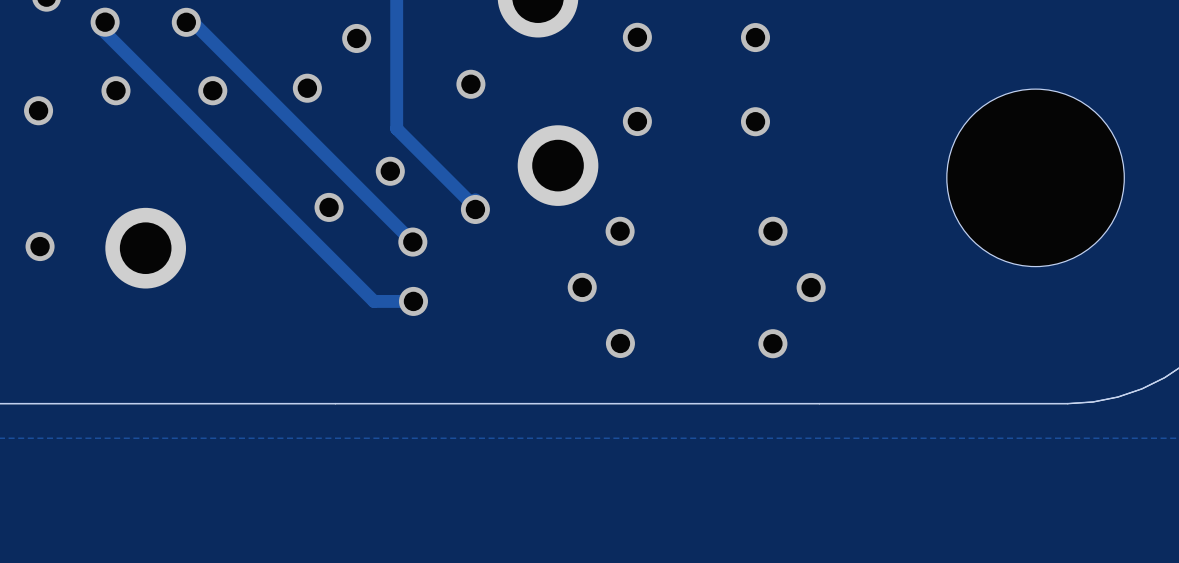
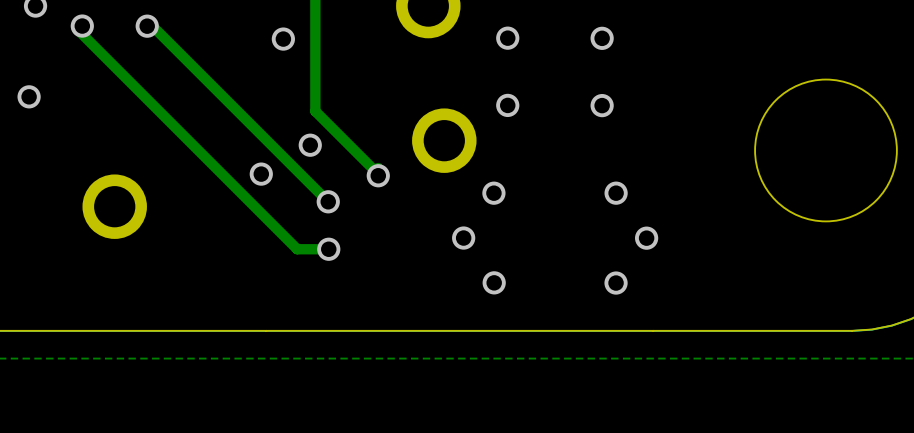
via: (470, 84) -> none
via: (307, 88) -> none
via: (115, 90) -> none
via: (212, 90) -> none
via: (40, 246) -> none

